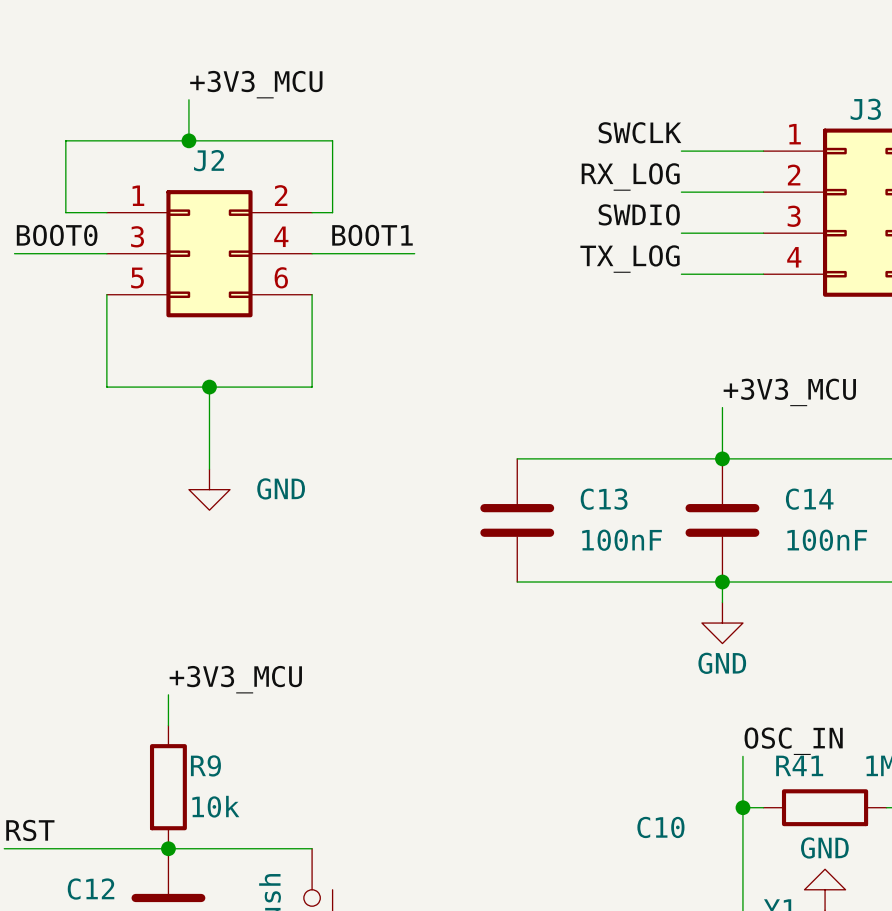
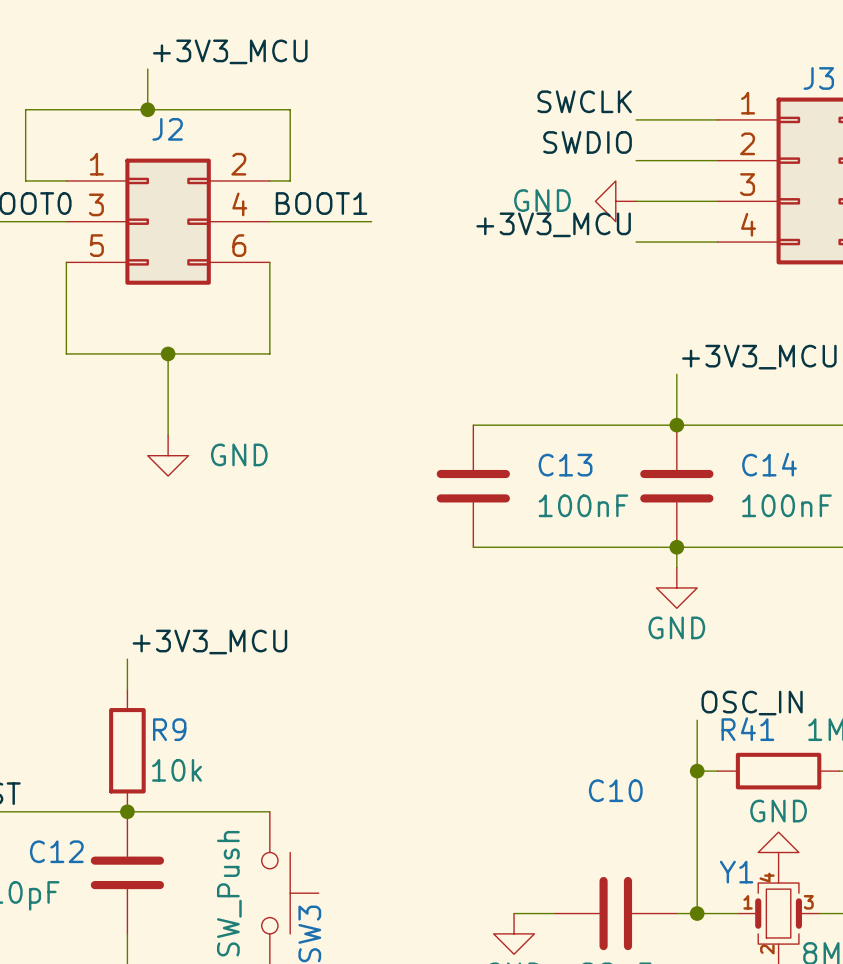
label: RX_LOG (630, 176) -> SWDIO (587, 142)
label: SWDIO (639, 214) -> none
power symbol: none -> GND (615, 201)
label: TX_LOG (630, 259) -> +3V3_MCU (553, 224)

